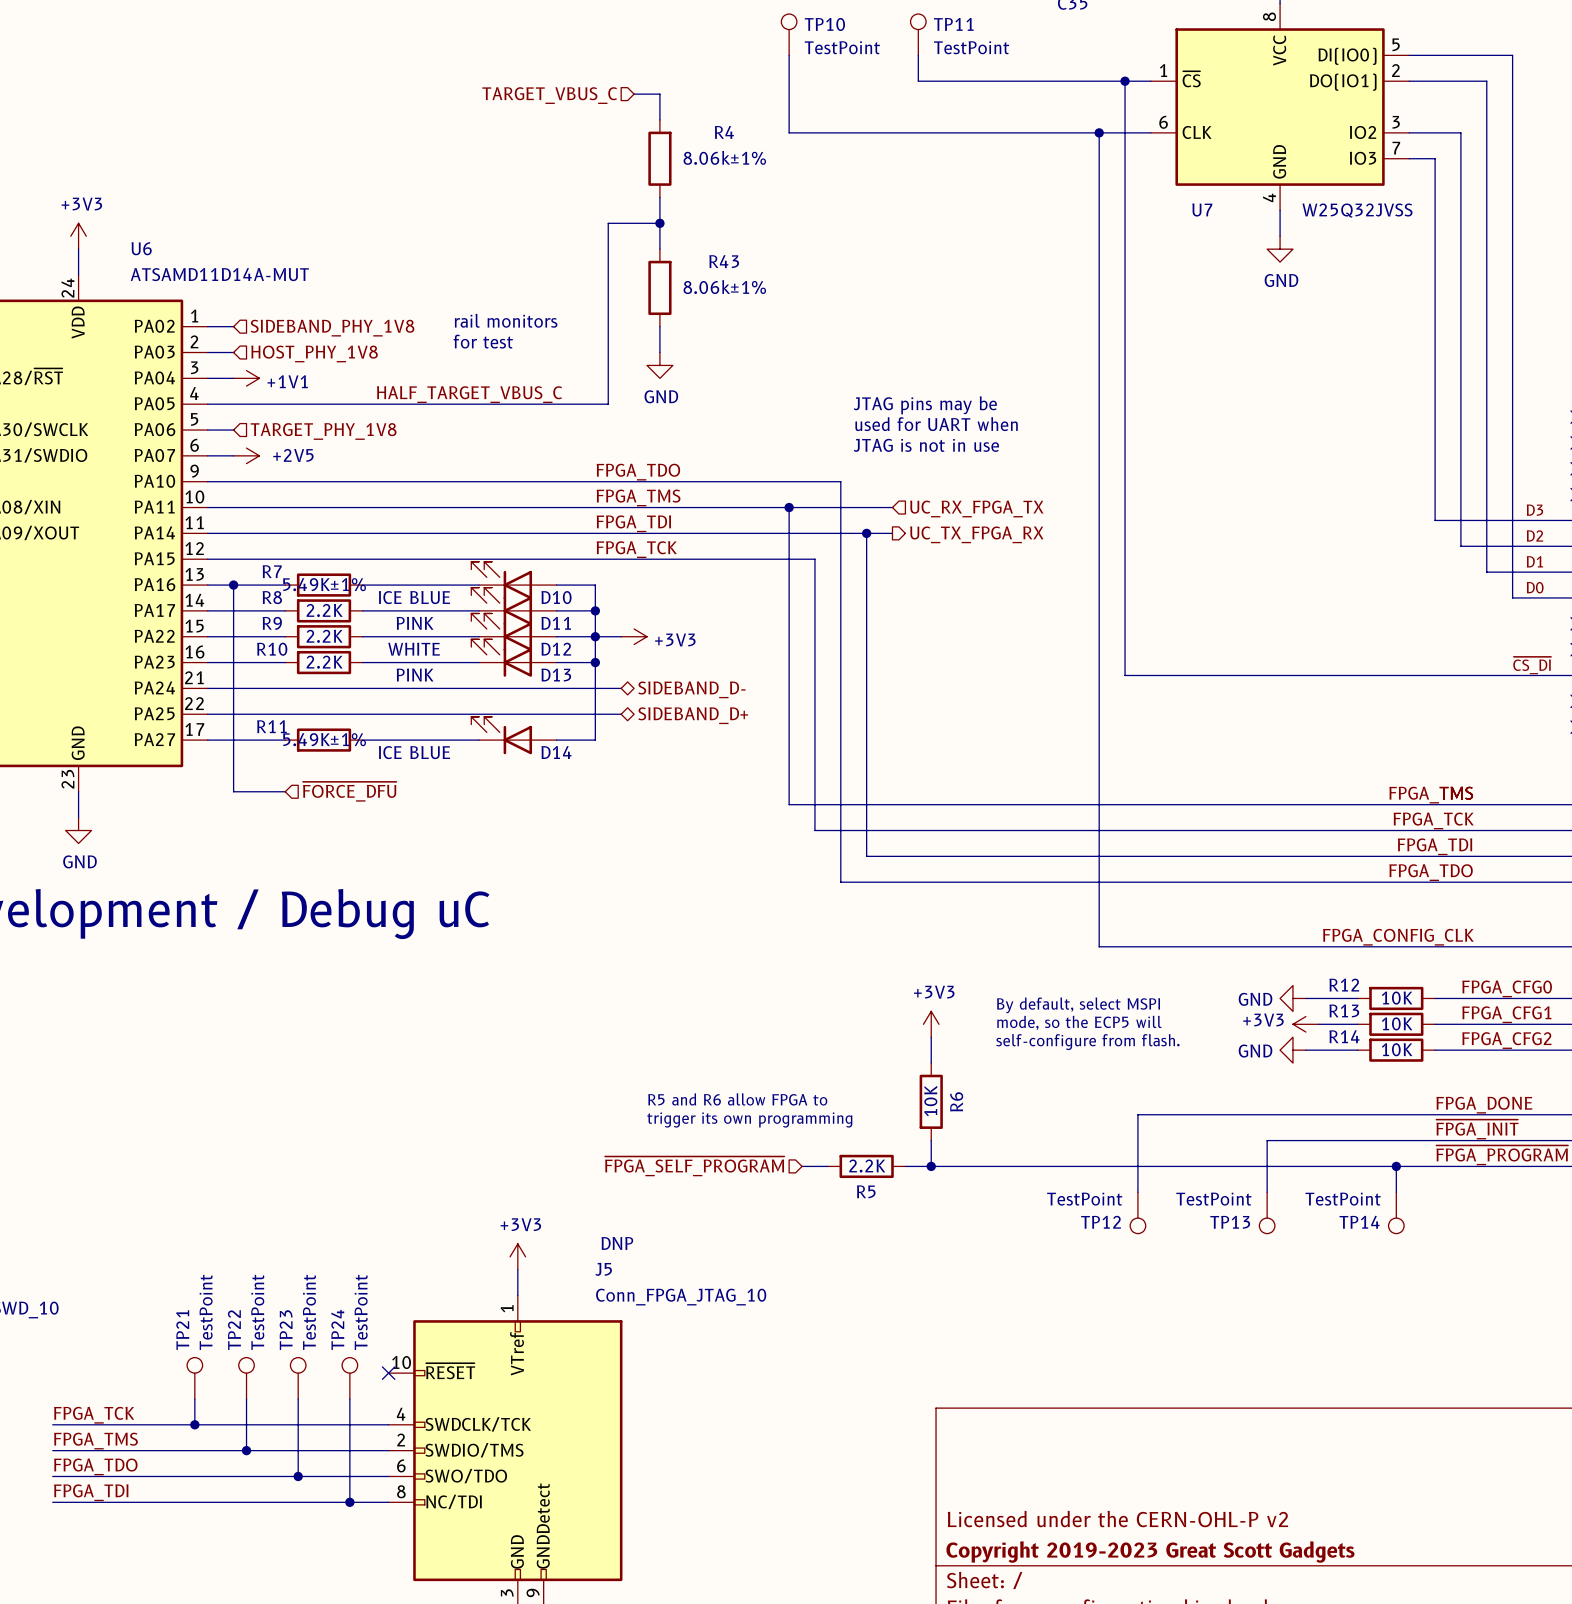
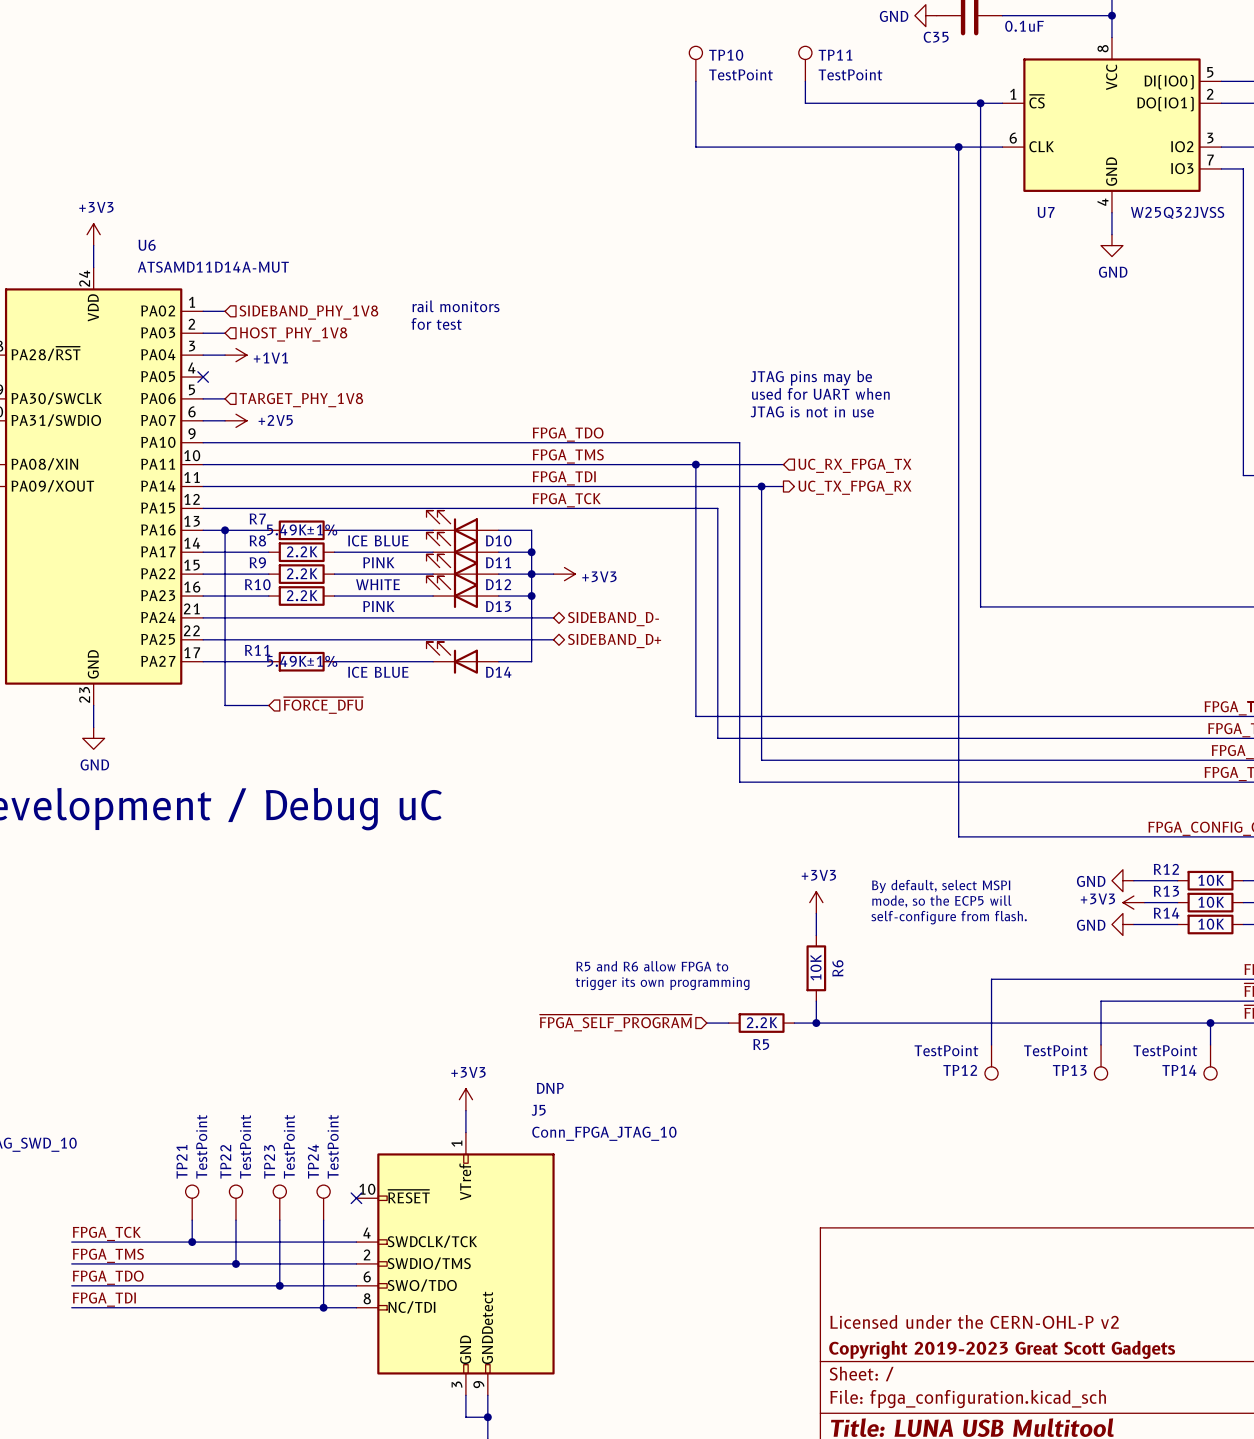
wire: (634, 94) (659, 94) (659, 119) -> none
hierarchical label: TARGET_VBUS_C (549, 95) -> none
R4: 8.06k±1% (659, 158) -> none
wire: (659, 197) (659, 249) -> none
wire: (659, 223) (608, 223) (608, 404) (207, 404) -> none
junction: (659, 223) -> none
R43: 8.06k±1% (659, 287) -> none
wire: (659, 326) (659, 352) -> none
power symbol: GND (659, 365) -> none
label: HALF_TARGET_VBUS_C (469, 394) -> none
no-connect mark: none -> (203, 377)

